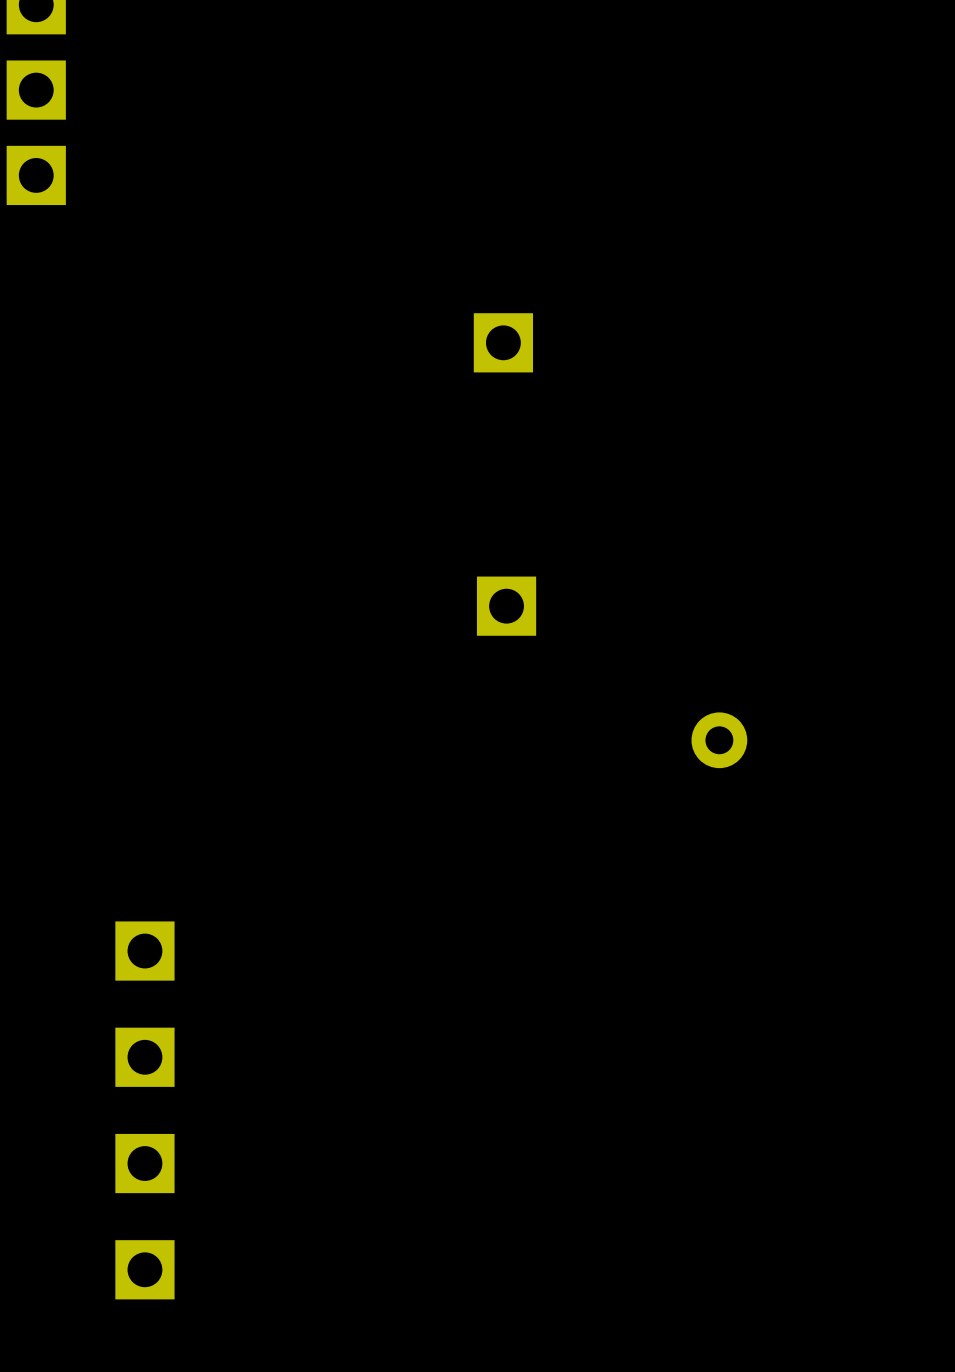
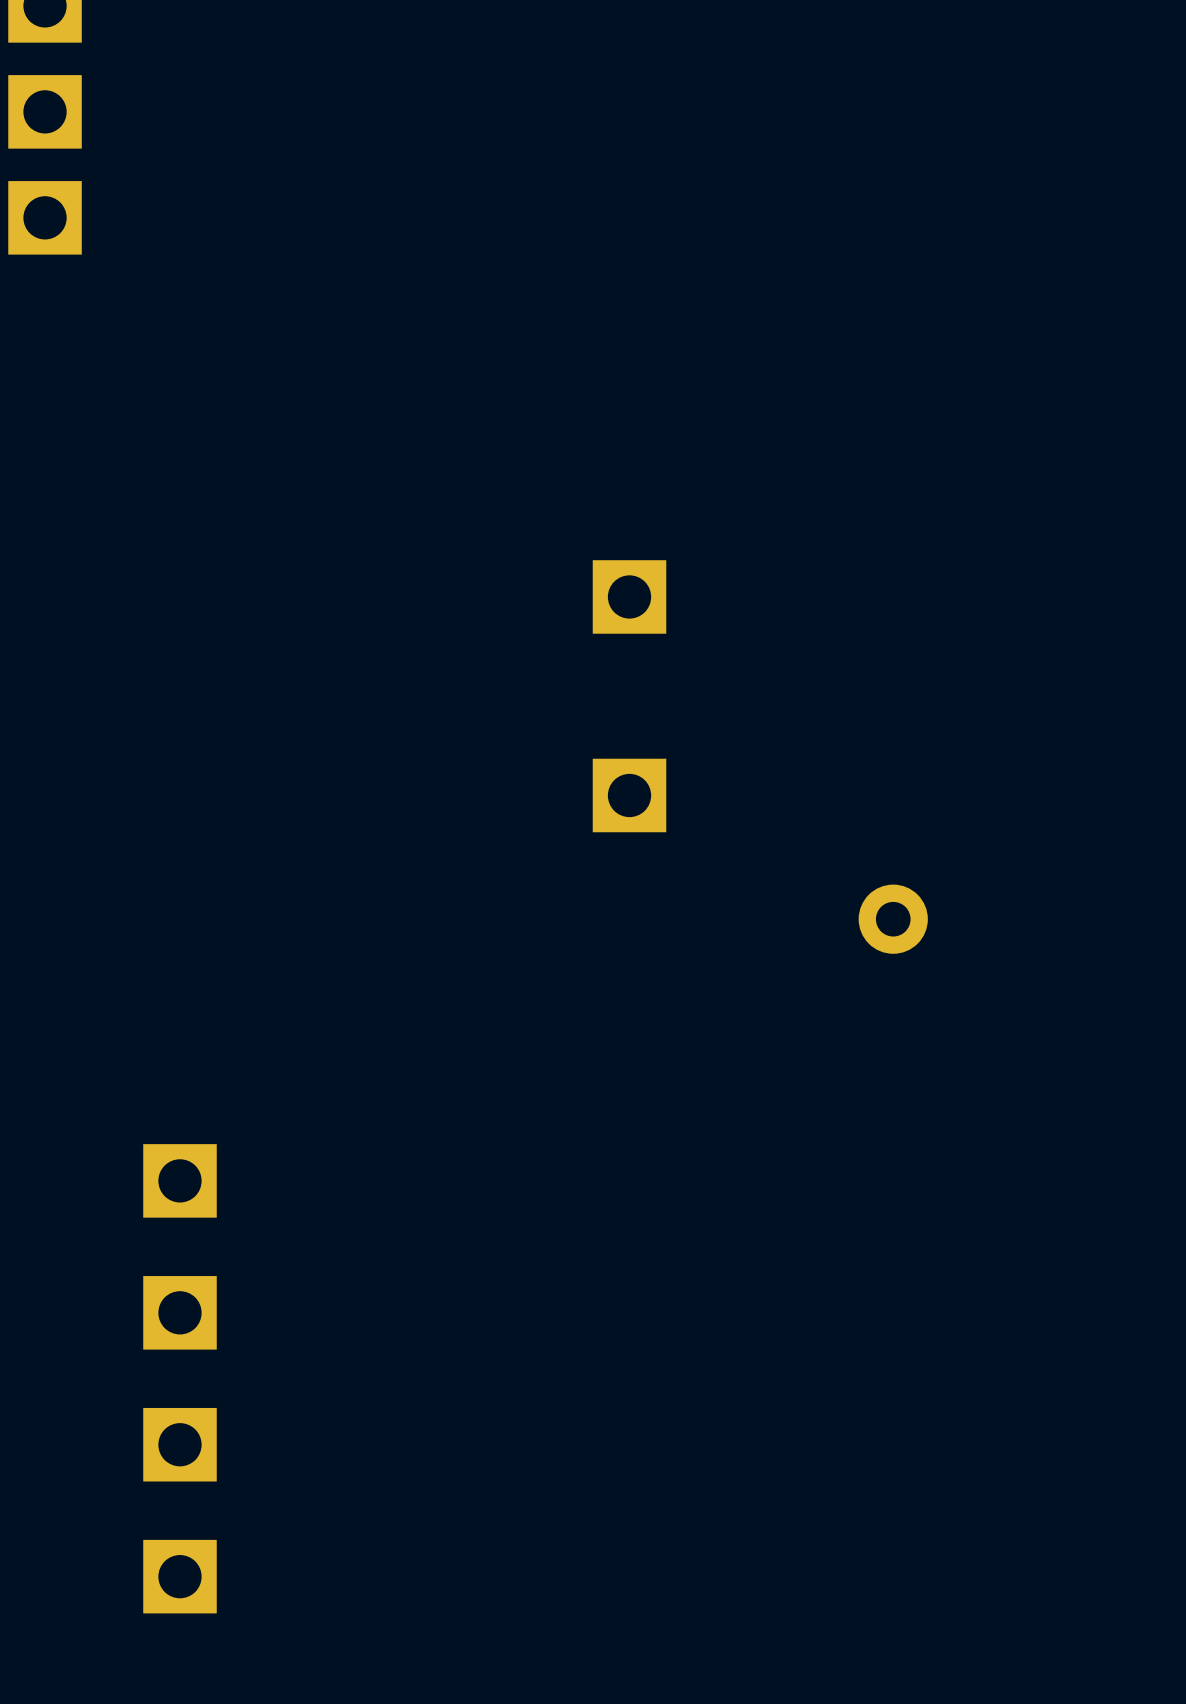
part position: (503, 342) -> (629, 596)
part position: (506, 606) -> (629, 795)

